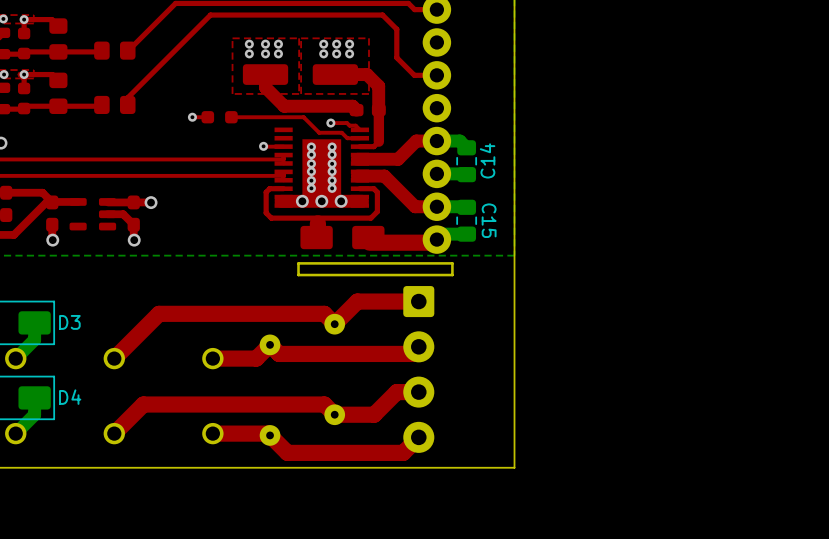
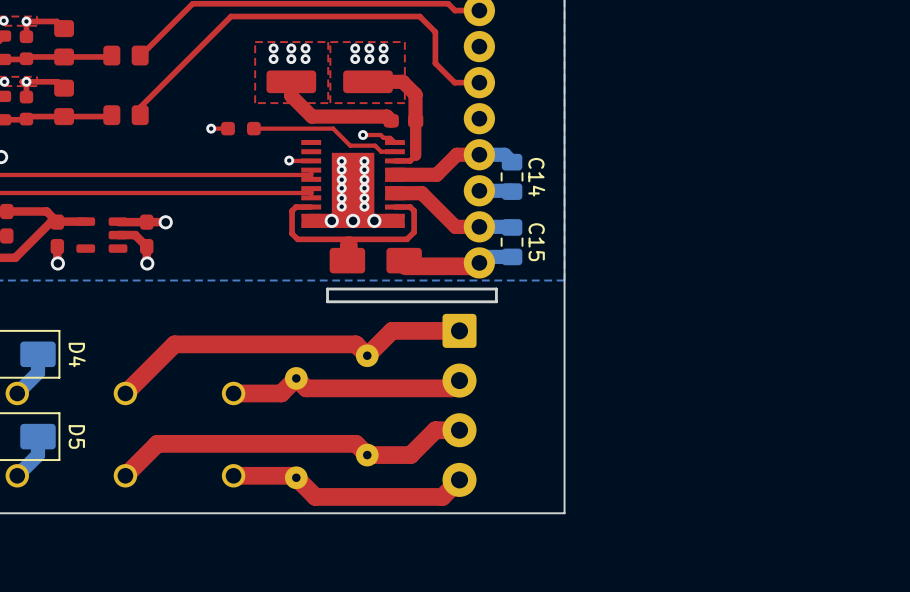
C14 name rotation: 0° (487, 160) -> 180° (536, 177)
D3 name: D3 (69, 322) -> D4 (77, 354)
D4 name: D4 (70, 397) -> D5 (76, 436)

